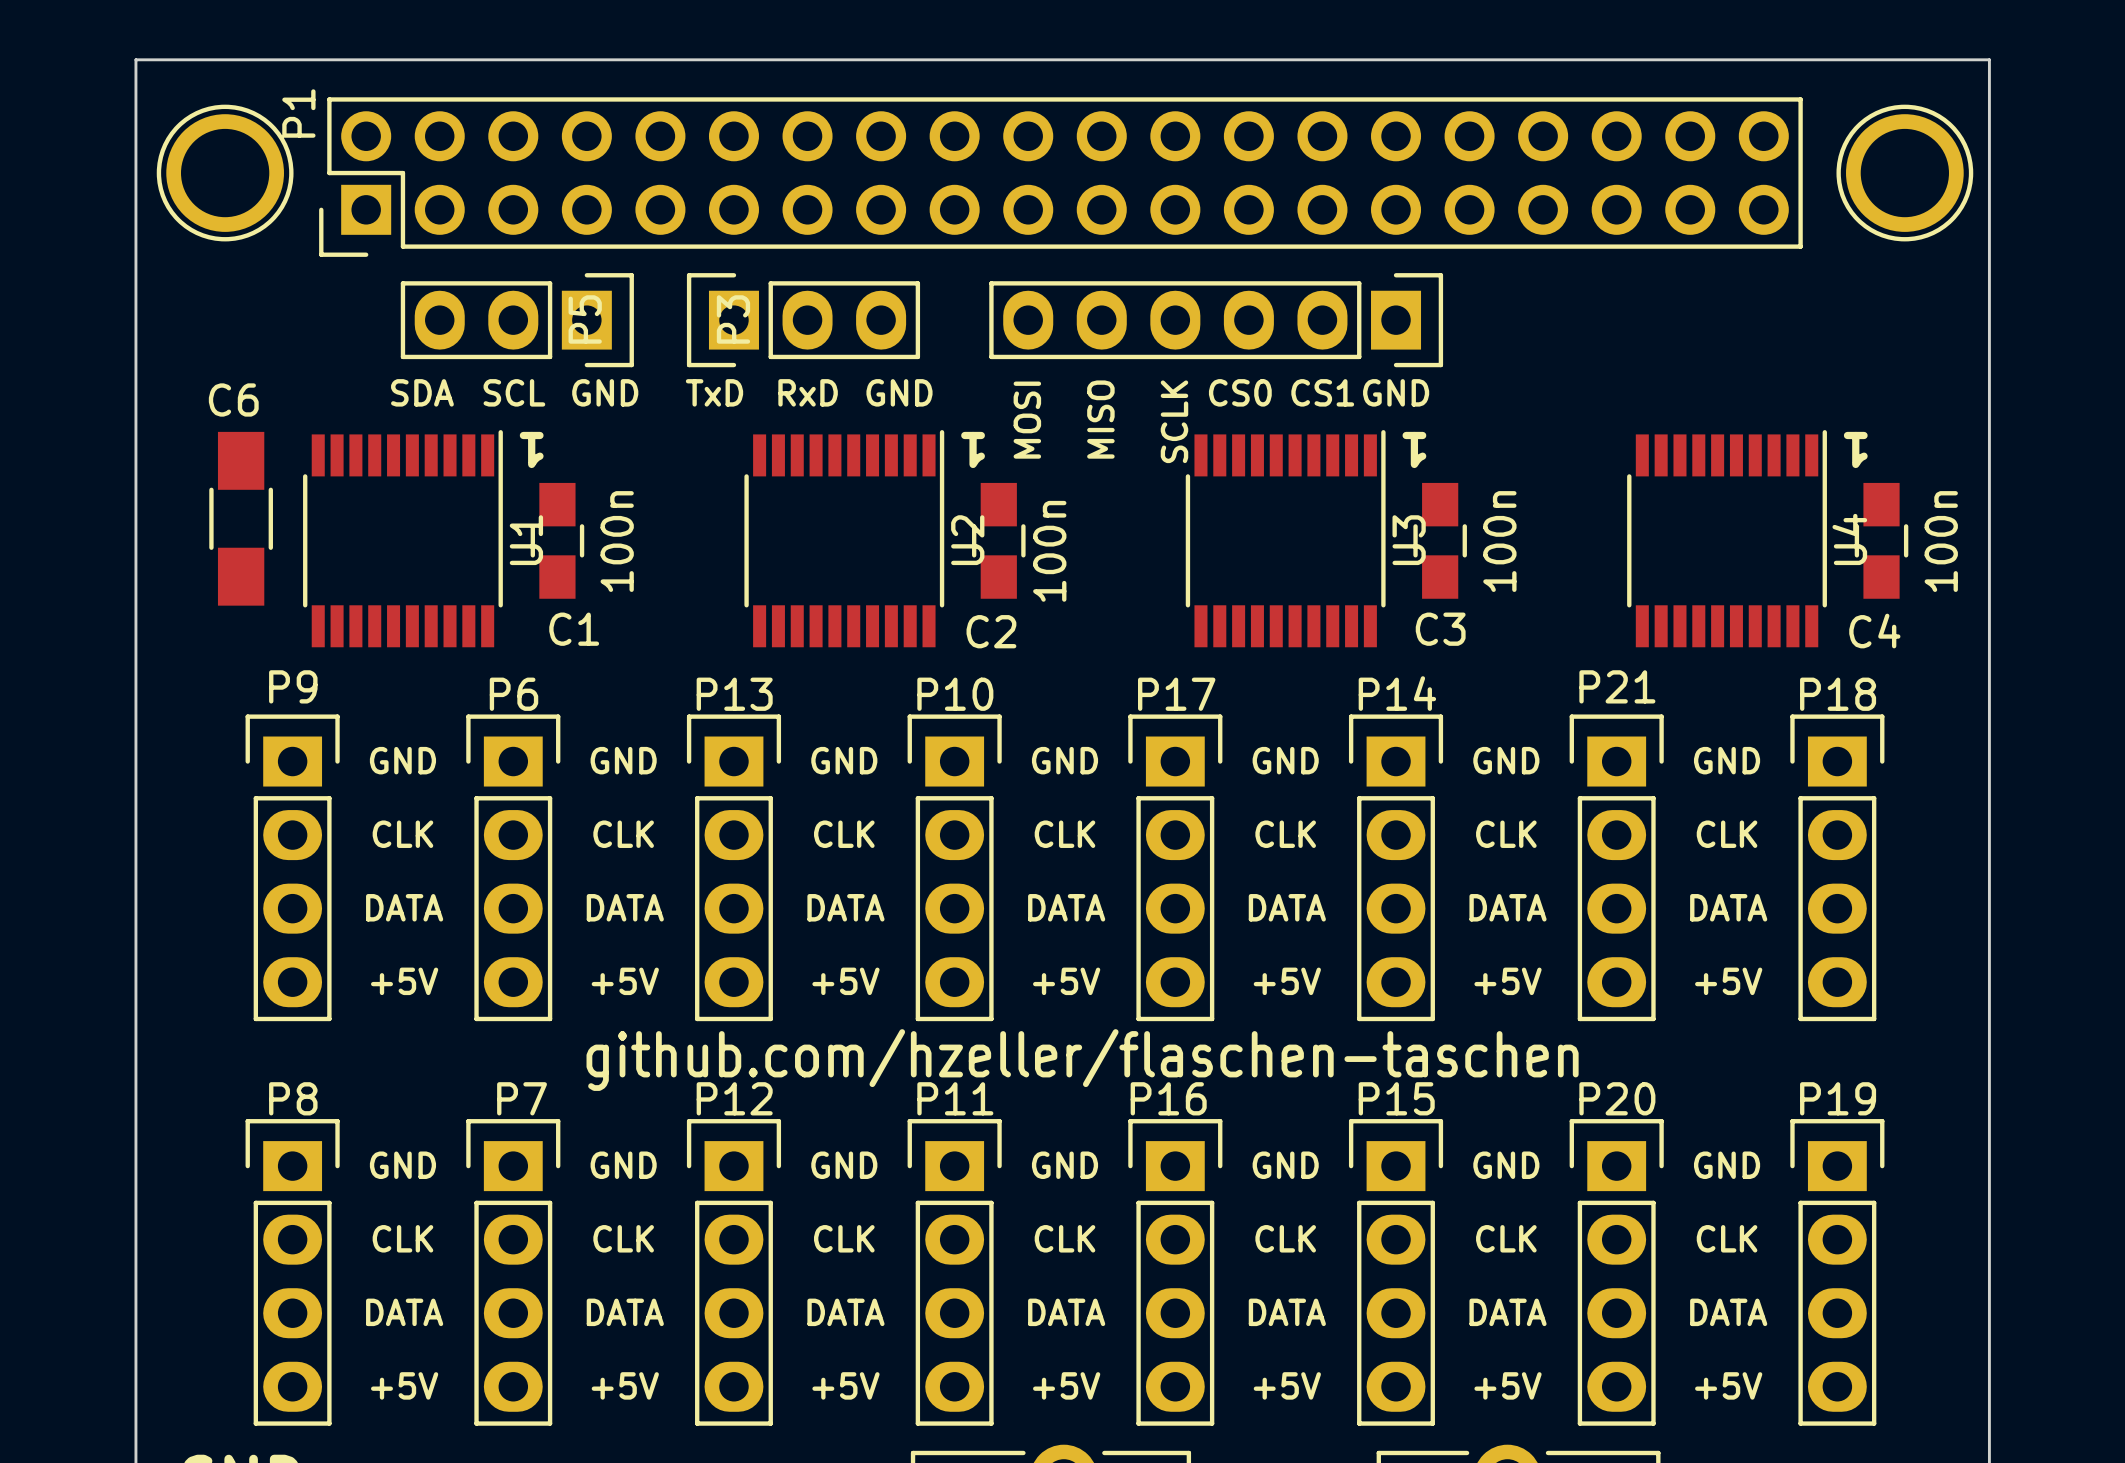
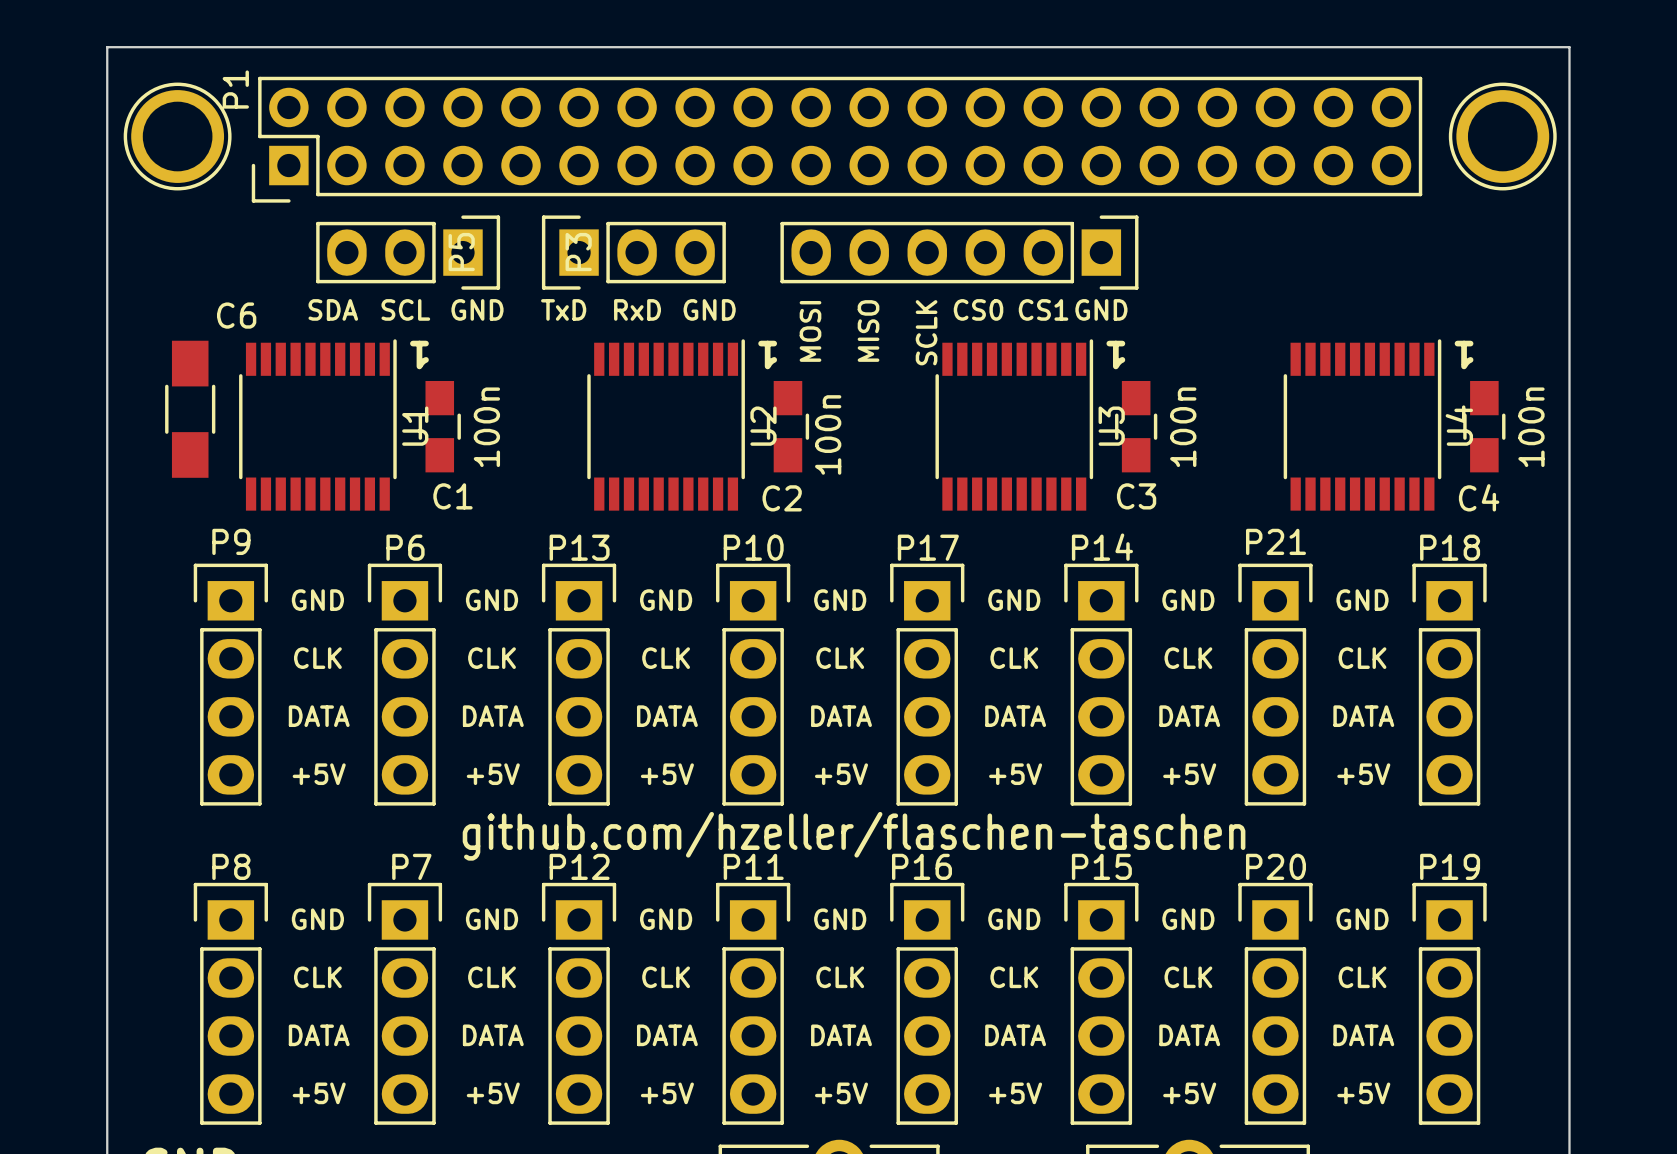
C6 name position: C6 (233, 399) -> C6 (236, 315)

